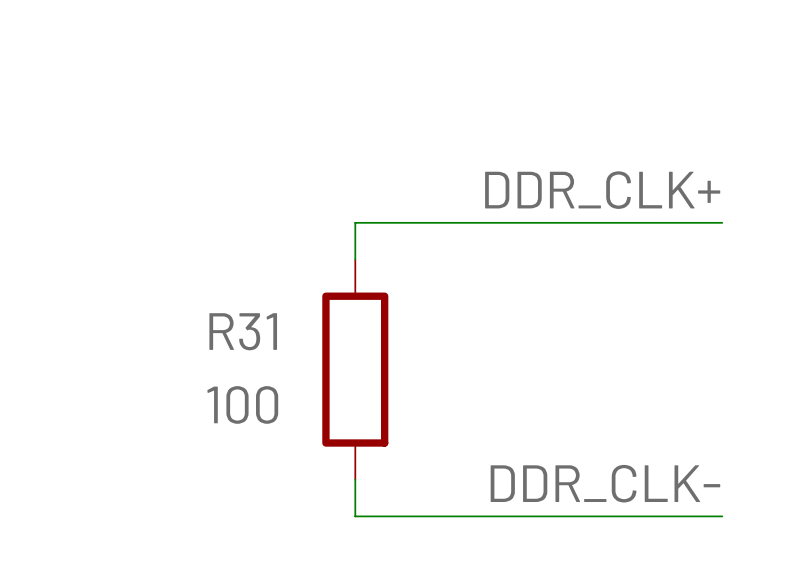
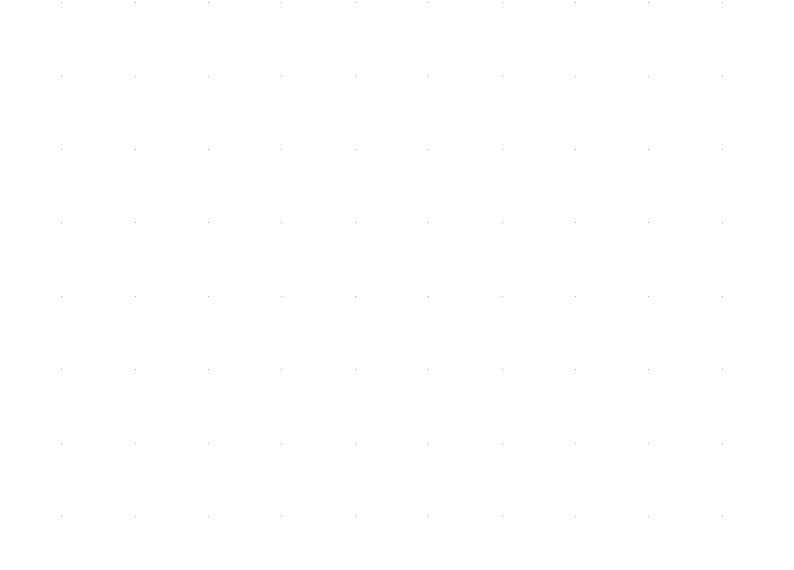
label: DDR_CLK+ (602, 190) -> none
wire: (722, 222) (355, 222) (355, 259) -> none
R31: 100 (355, 369) -> none
wire: (355, 479) (355, 516) (722, 516) -> none
label: DDR_CLK- (605, 483) -> none

